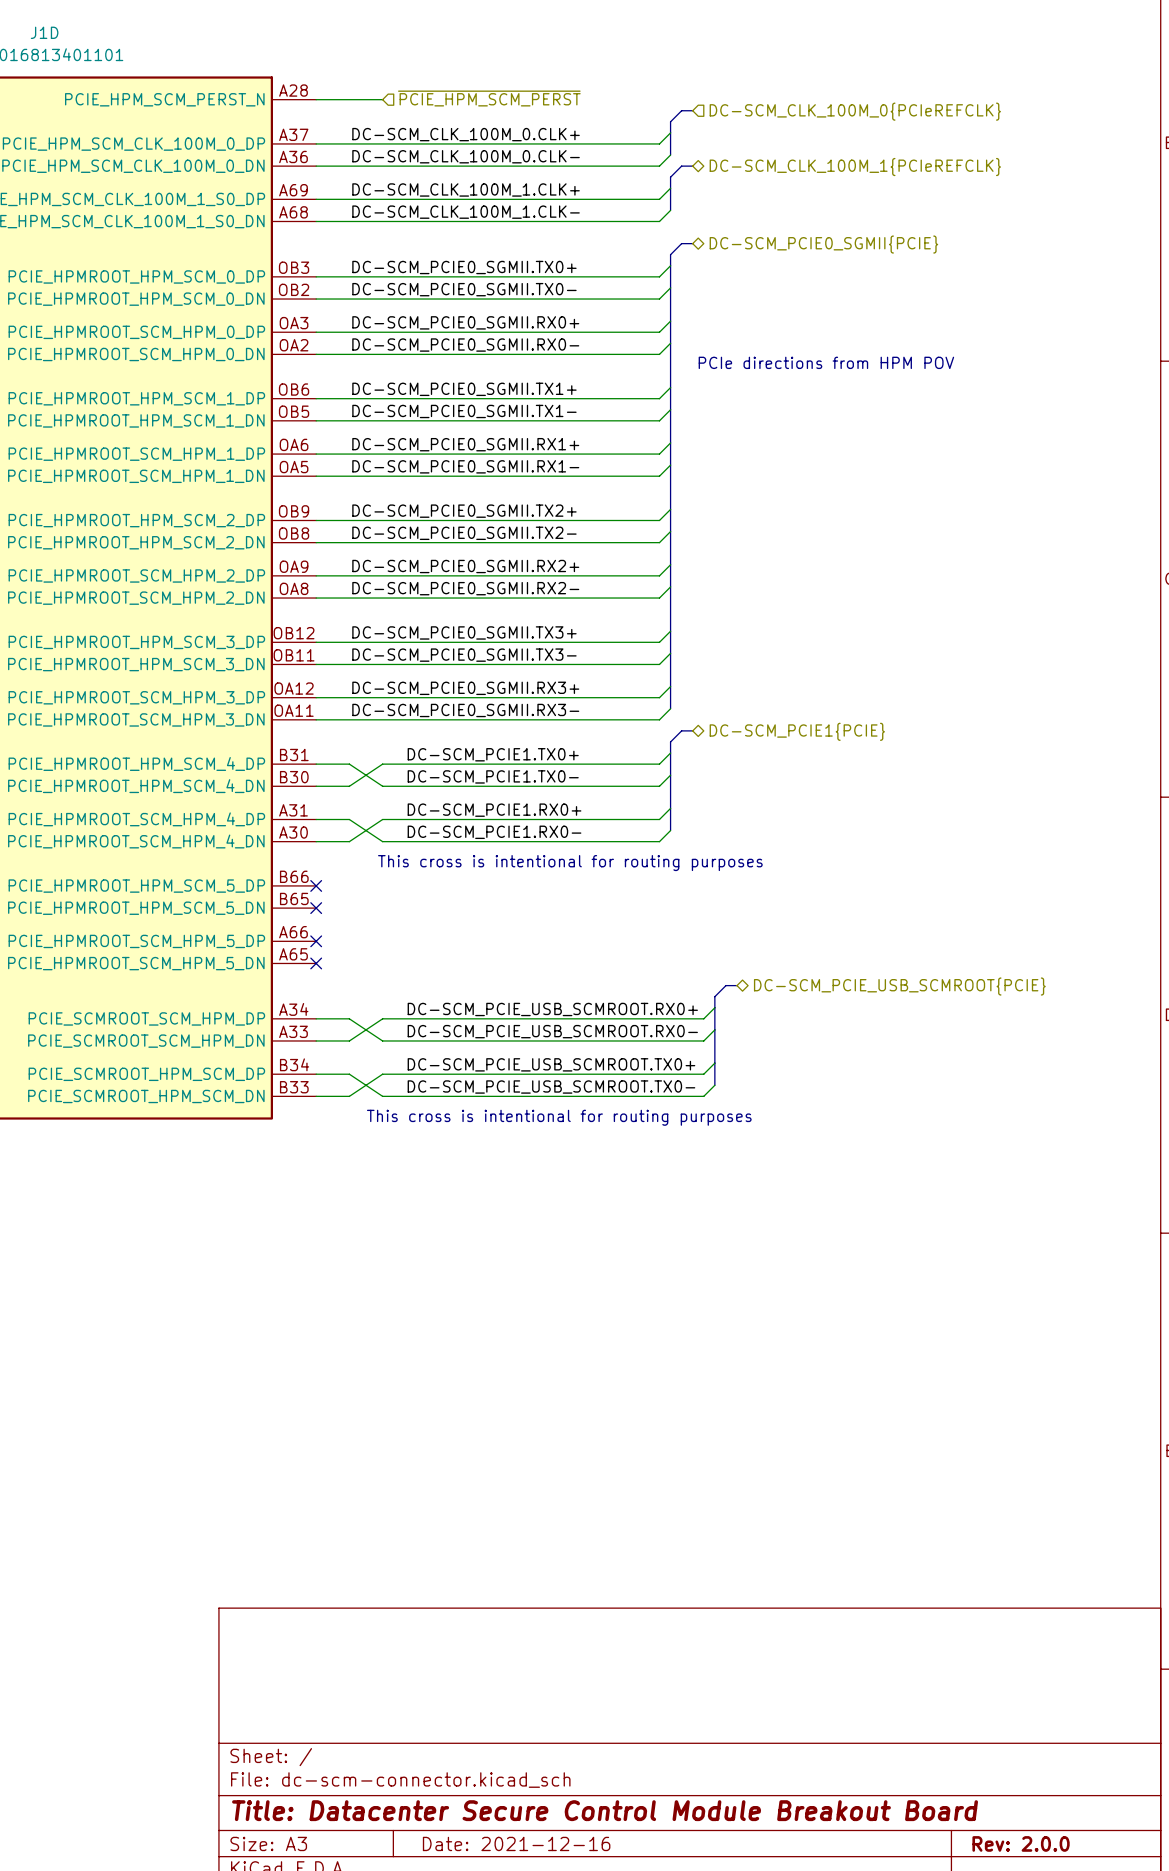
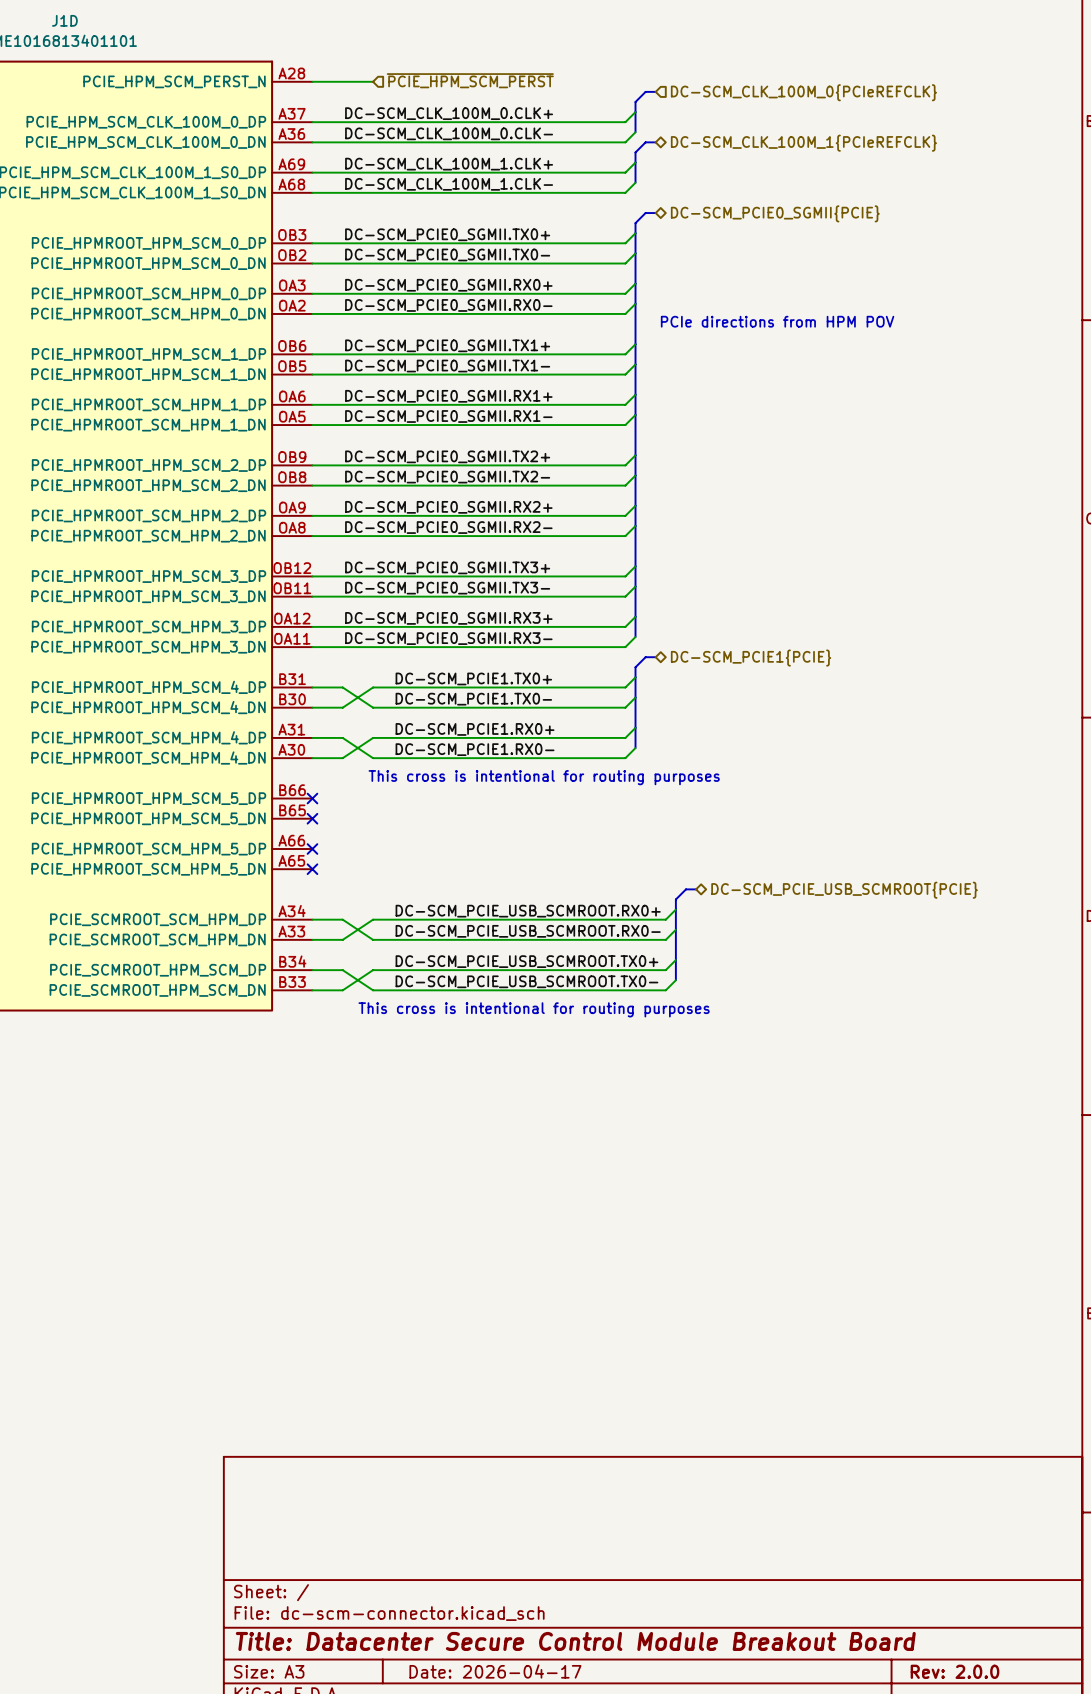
title block: Date: 2021-12-16 (516, 1843) -> Date: 2026-04-17 (495, 1671)

